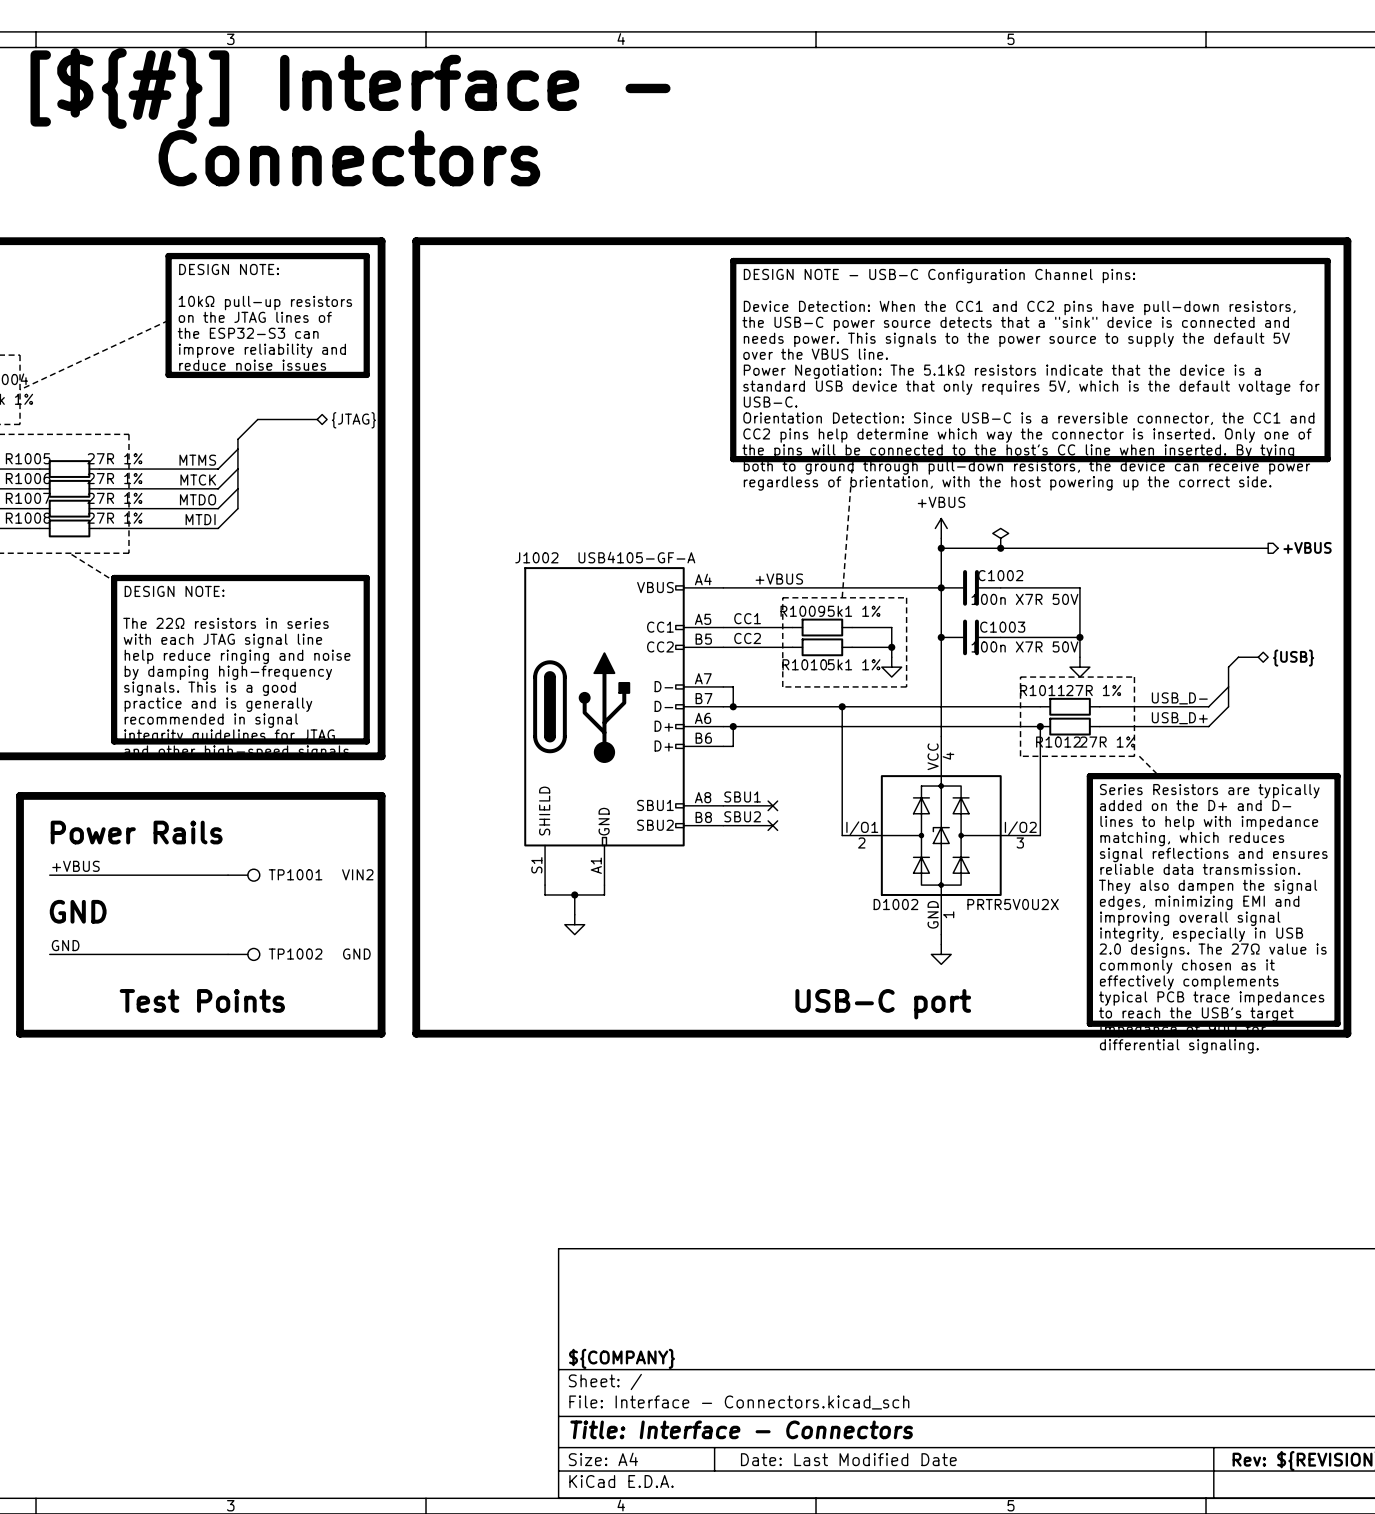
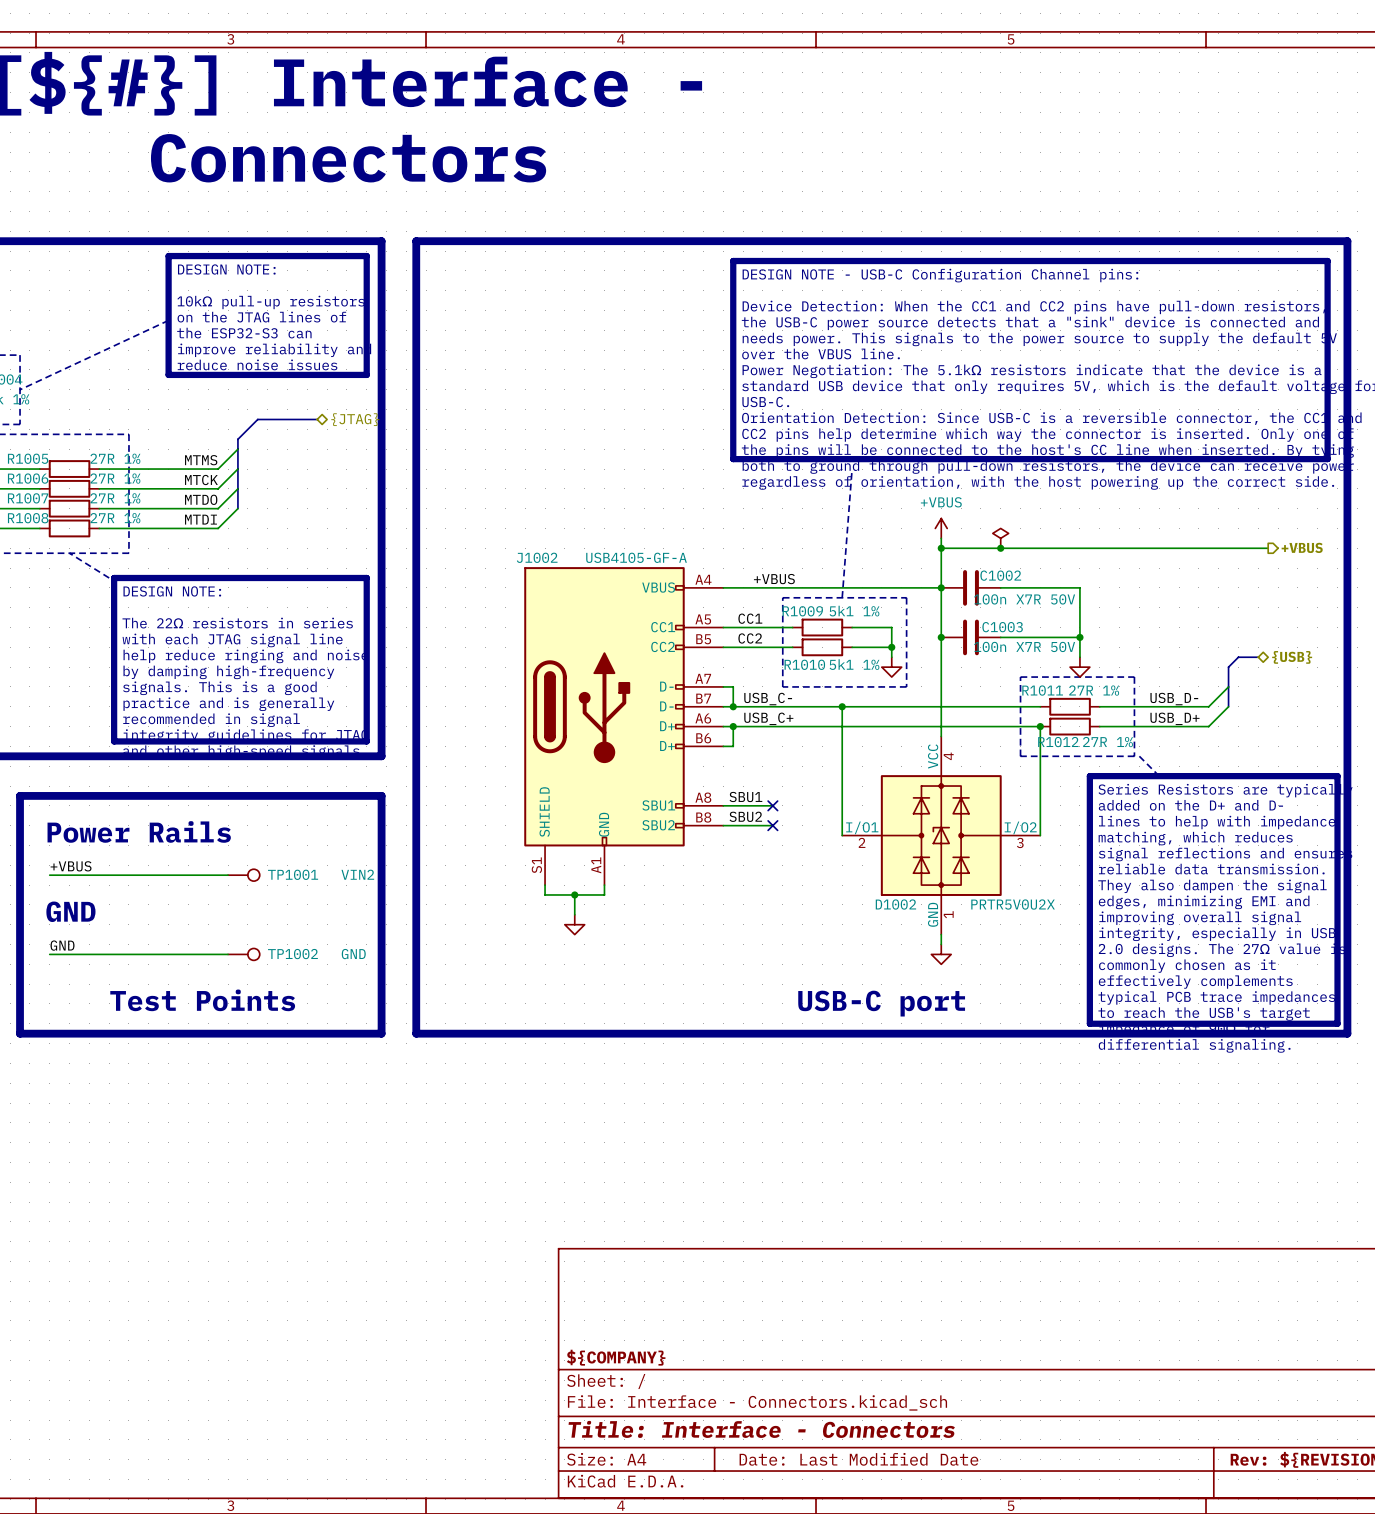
label: none -> USB_C- (768, 699)
label: none -> USB_C+ (768, 718)

